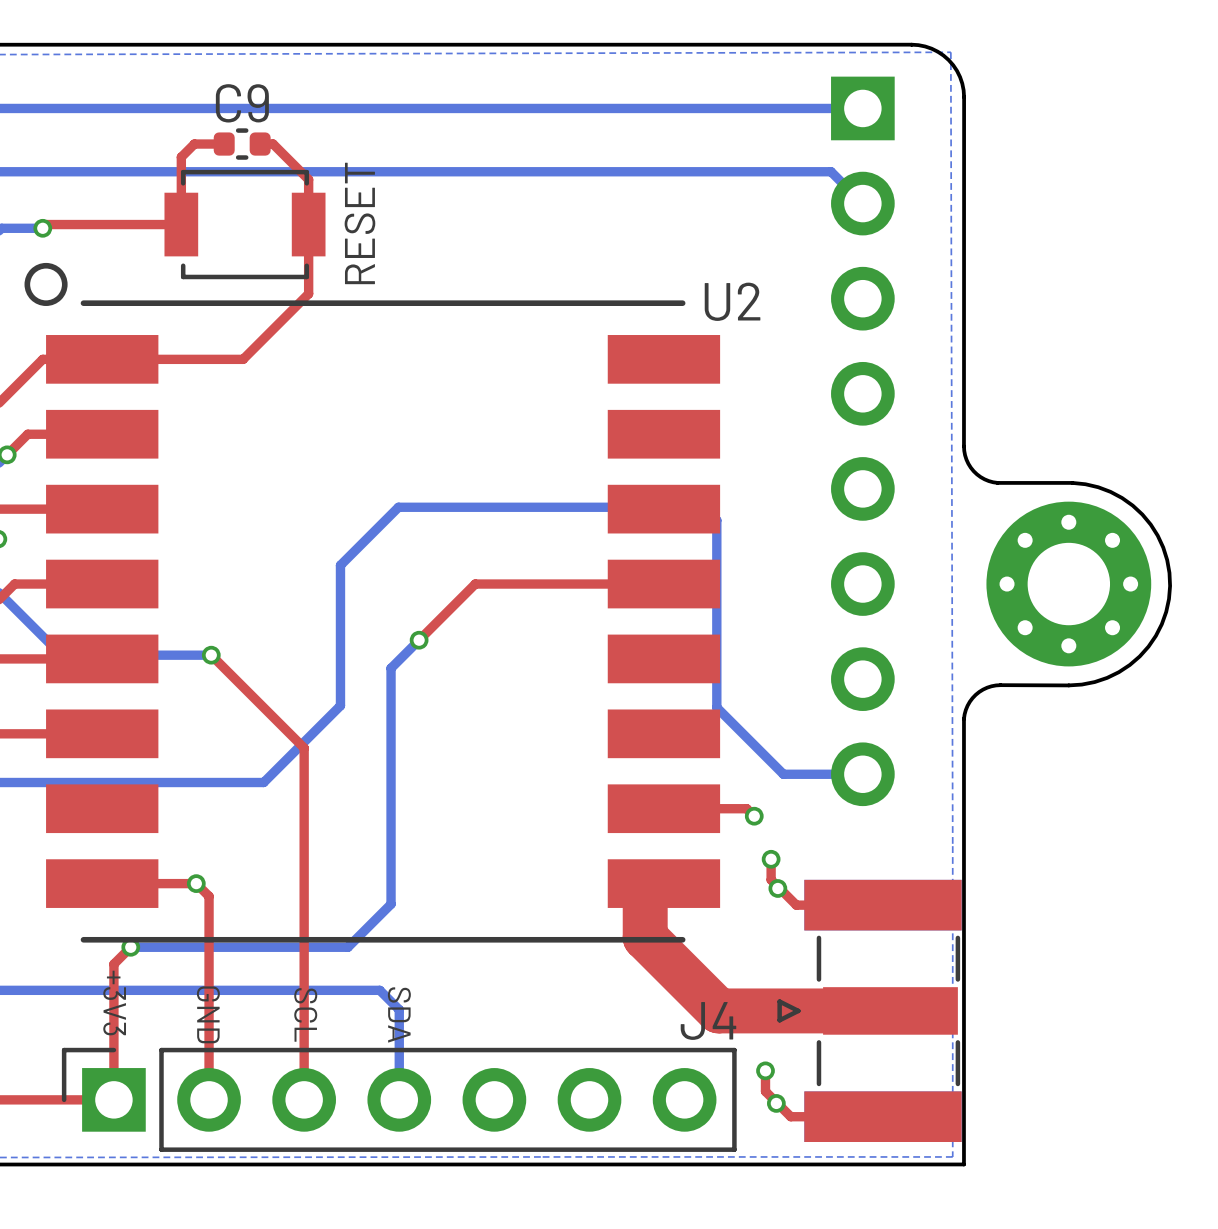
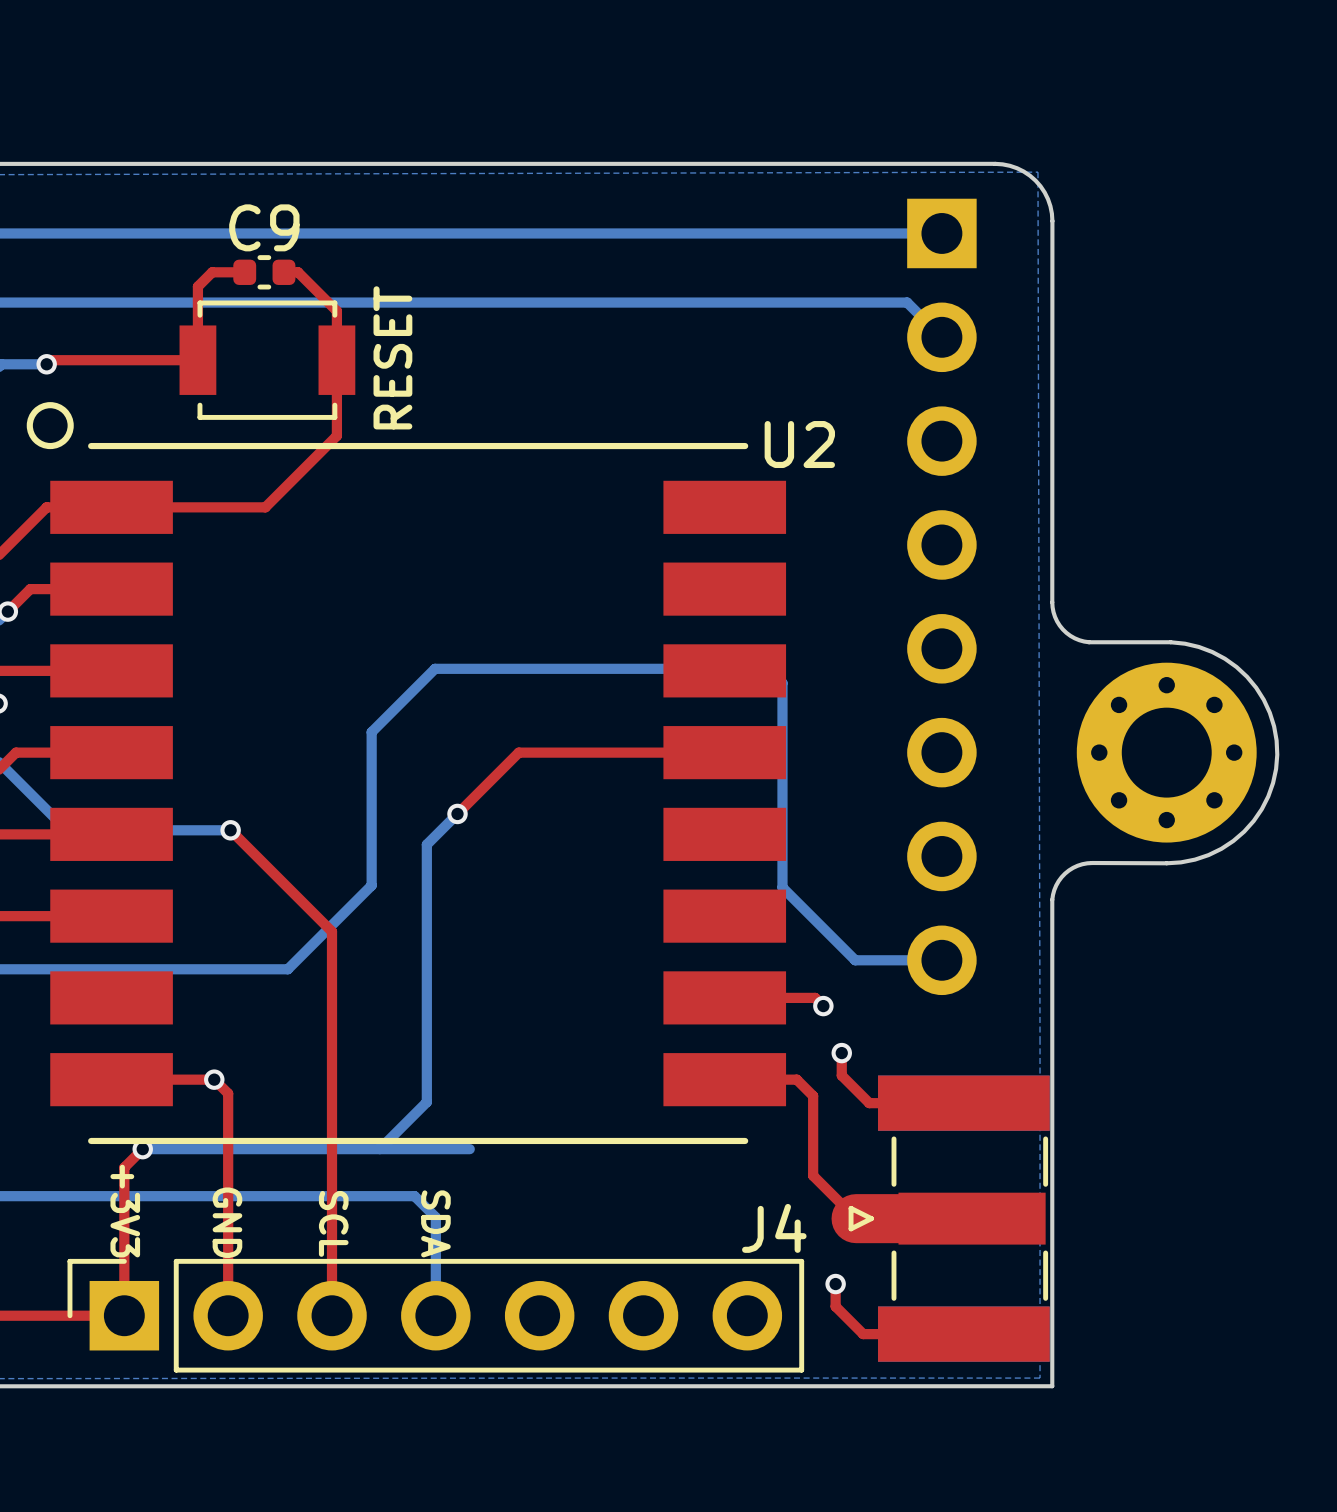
via: (777, 888) -> none
top track: (645, 899) (645, 937) (718, 1010) (784, 1010) -> (704, 1079) (796, 1079) (813, 1096) (813, 1175) (856, 1218)
bottom track: none -> (379, 1149) (469, 1149)
via: (776, 1103) -> none

